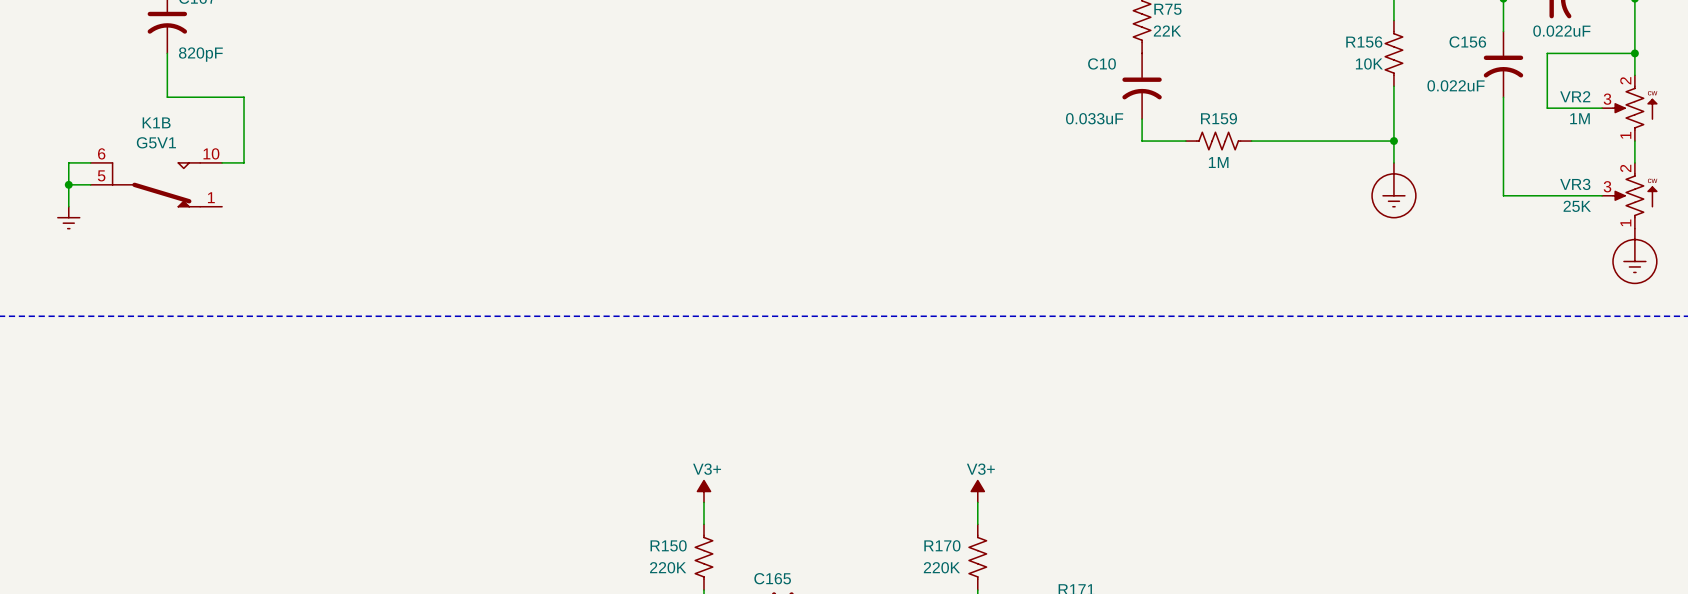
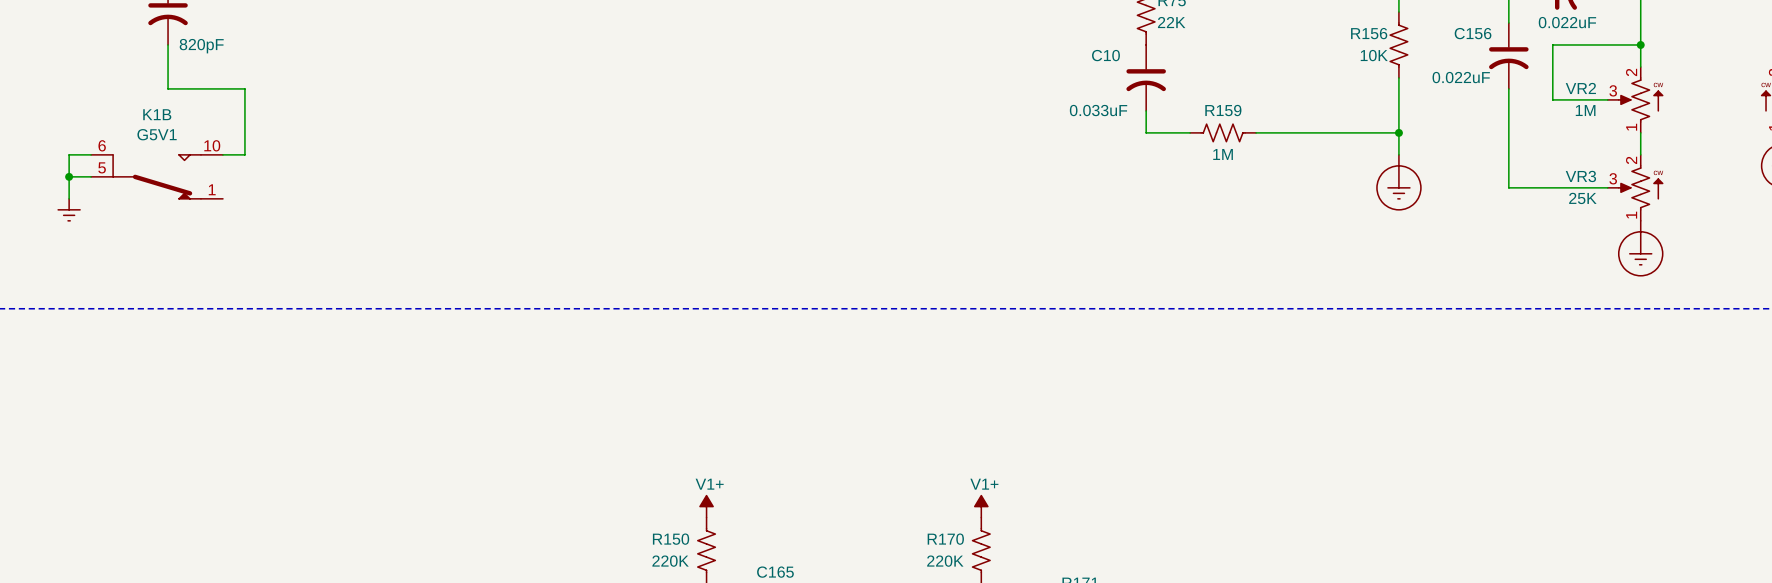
part: V3+ (703, 491) -> none
part: V3+ (977, 491) -> none
power symbol: none -> V1+ (706, 506)
power symbol: none -> V1+ (981, 506)

